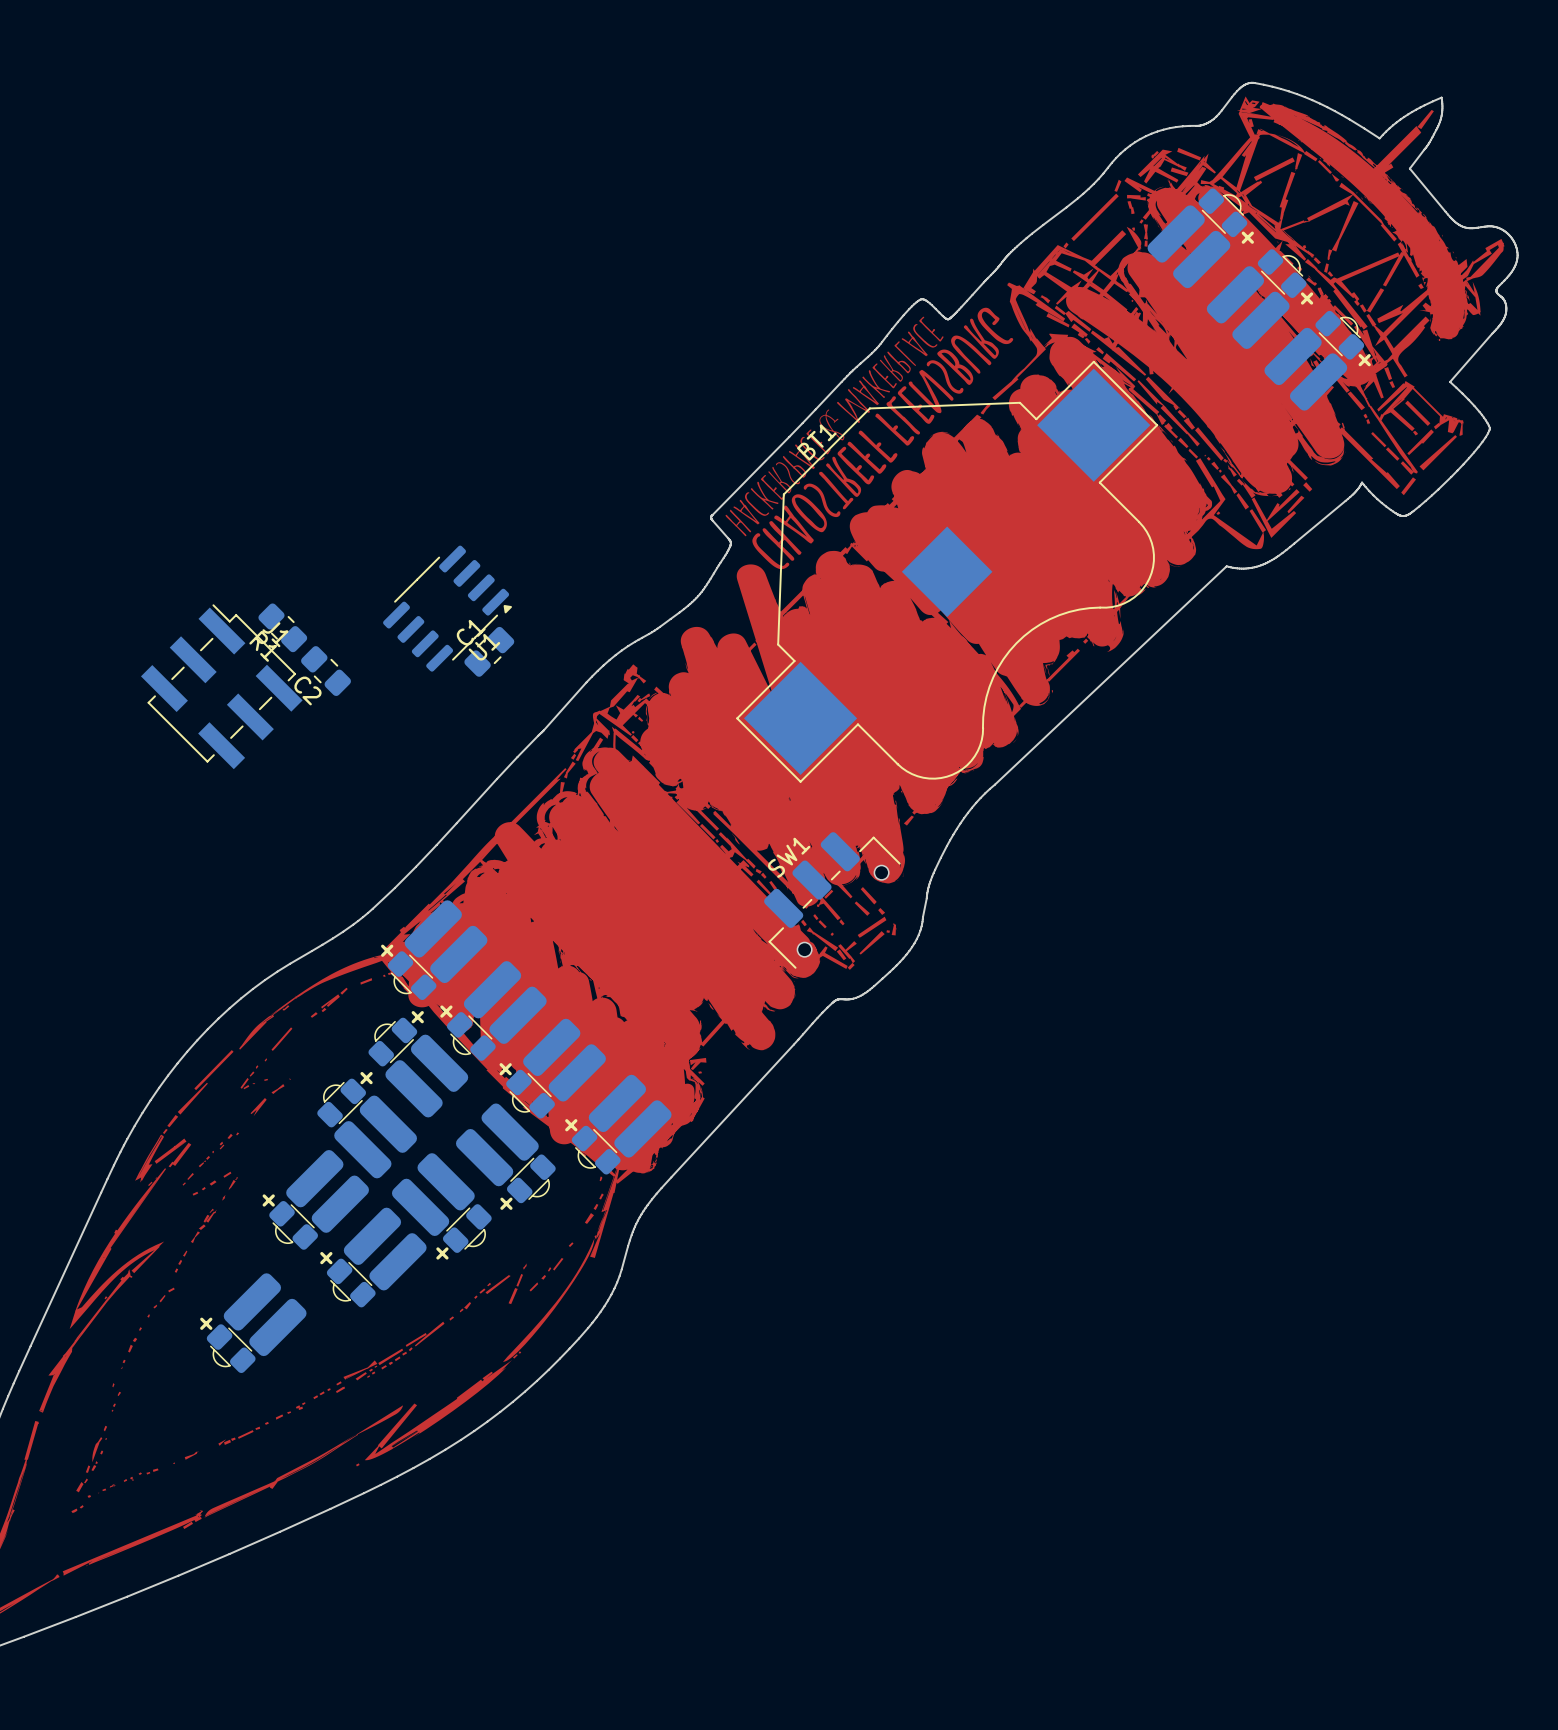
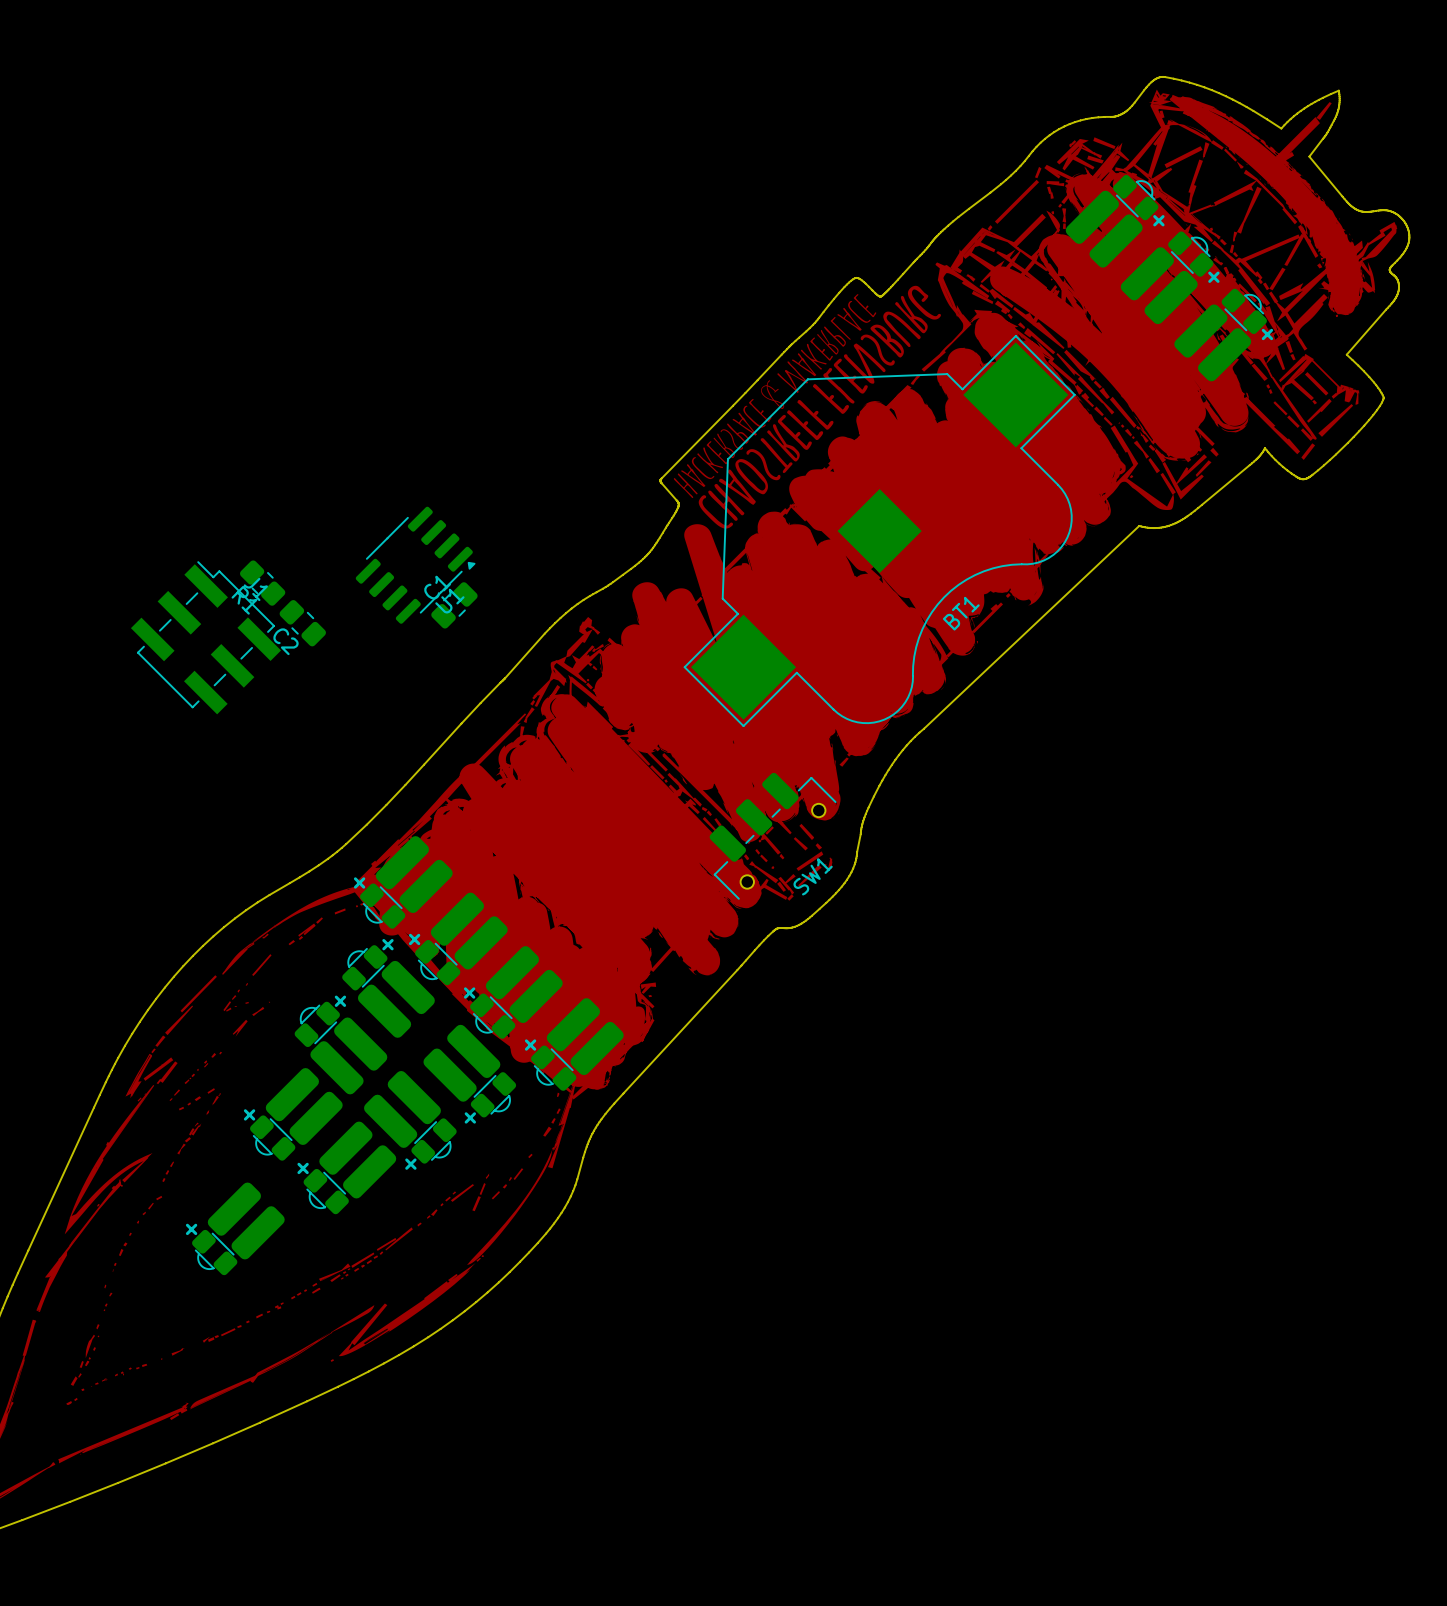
BT1 name position: BT1 (816, 442) -> BT1 (961, 613)
SW1 name position: SW1 (789, 857) -> SW1 (813, 876)

